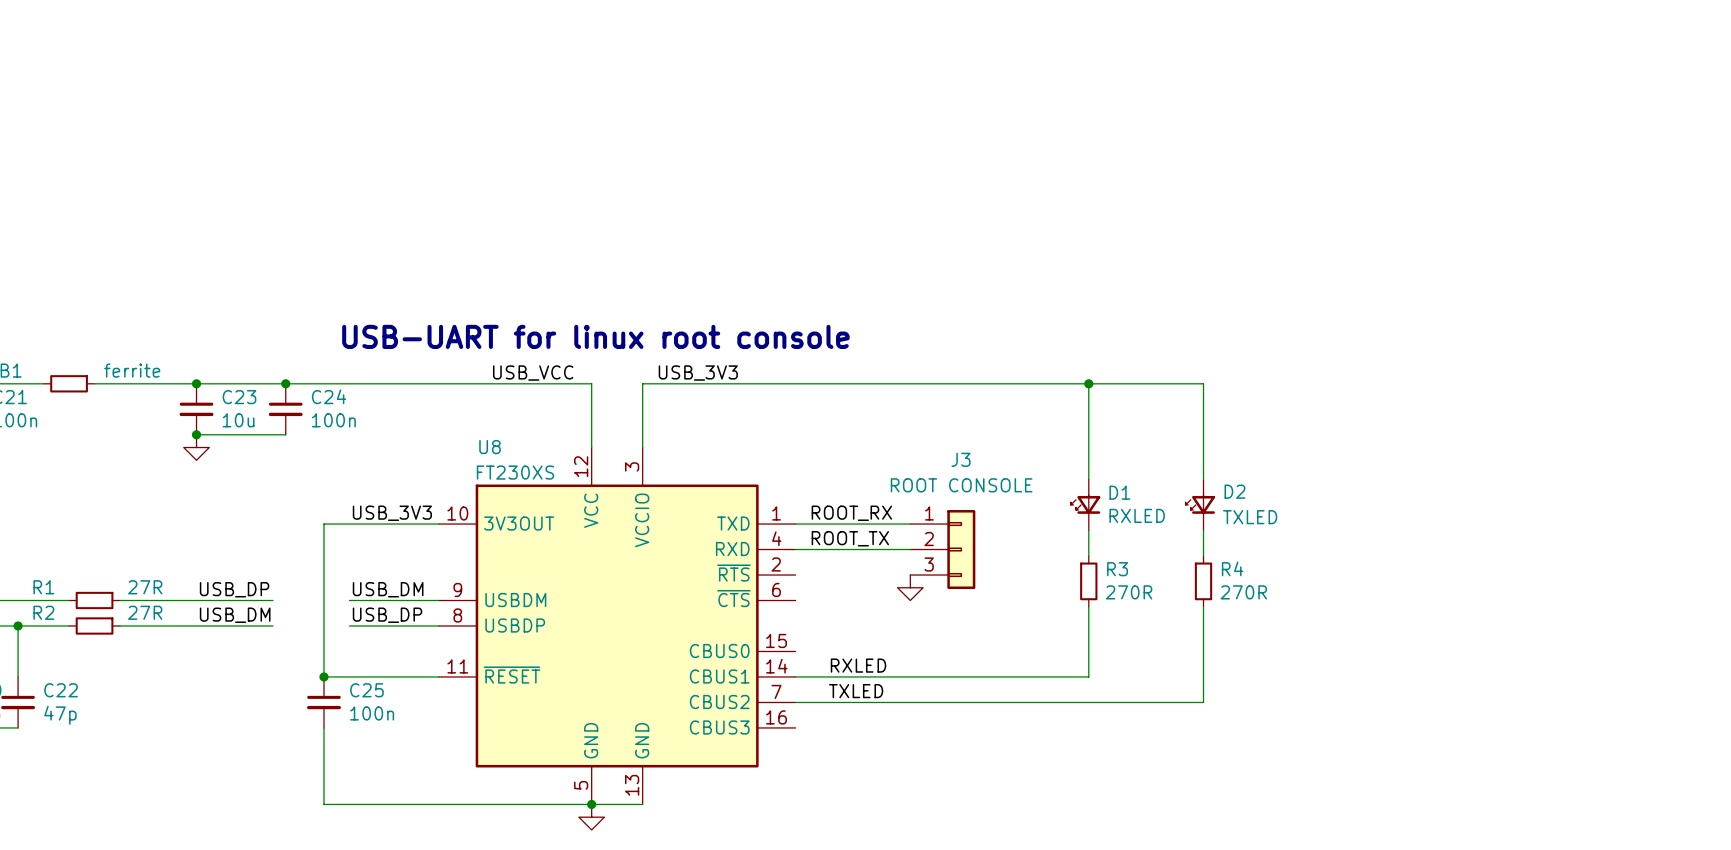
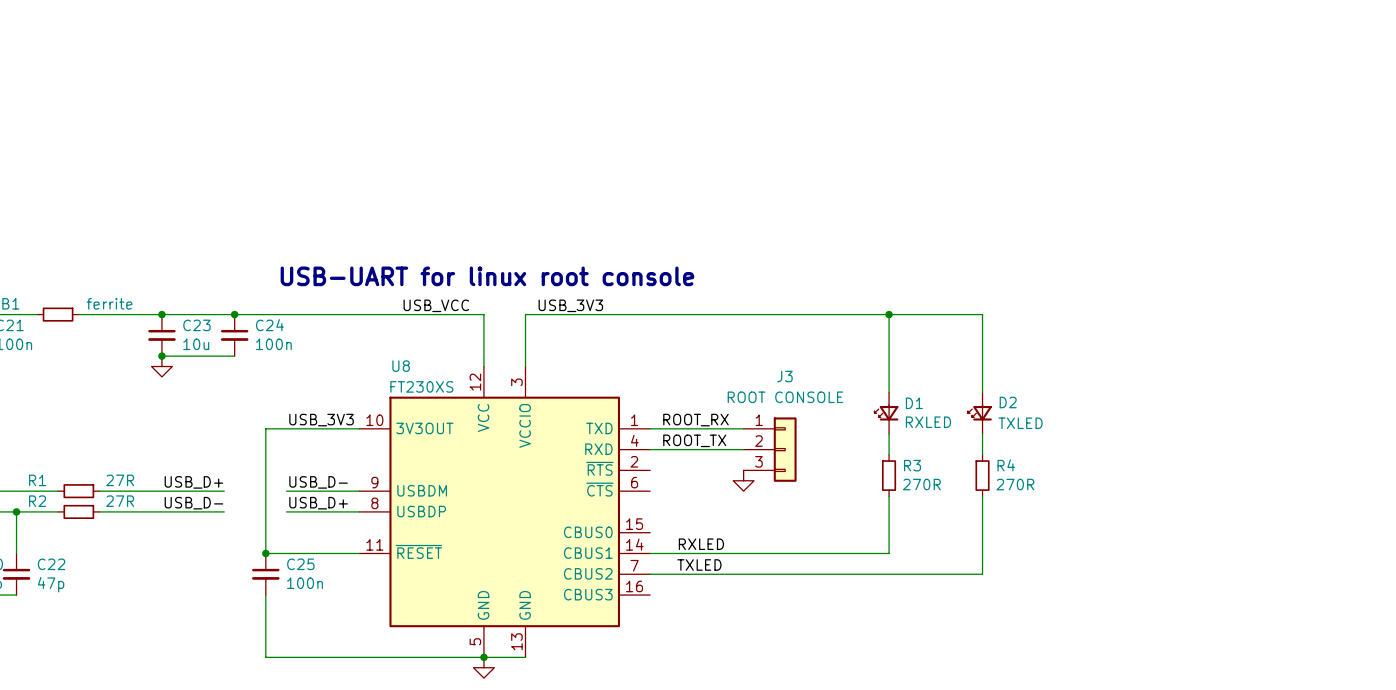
label: USB_DP (234, 589) -> USB_D+ (193, 482)
label: USB_DM (388, 589) -> USB_D- (318, 482)
label: USB_DM (235, 615) -> USB_D- (193, 503)
label: USB_DP (387, 615) -> USB_D+ (318, 503)

